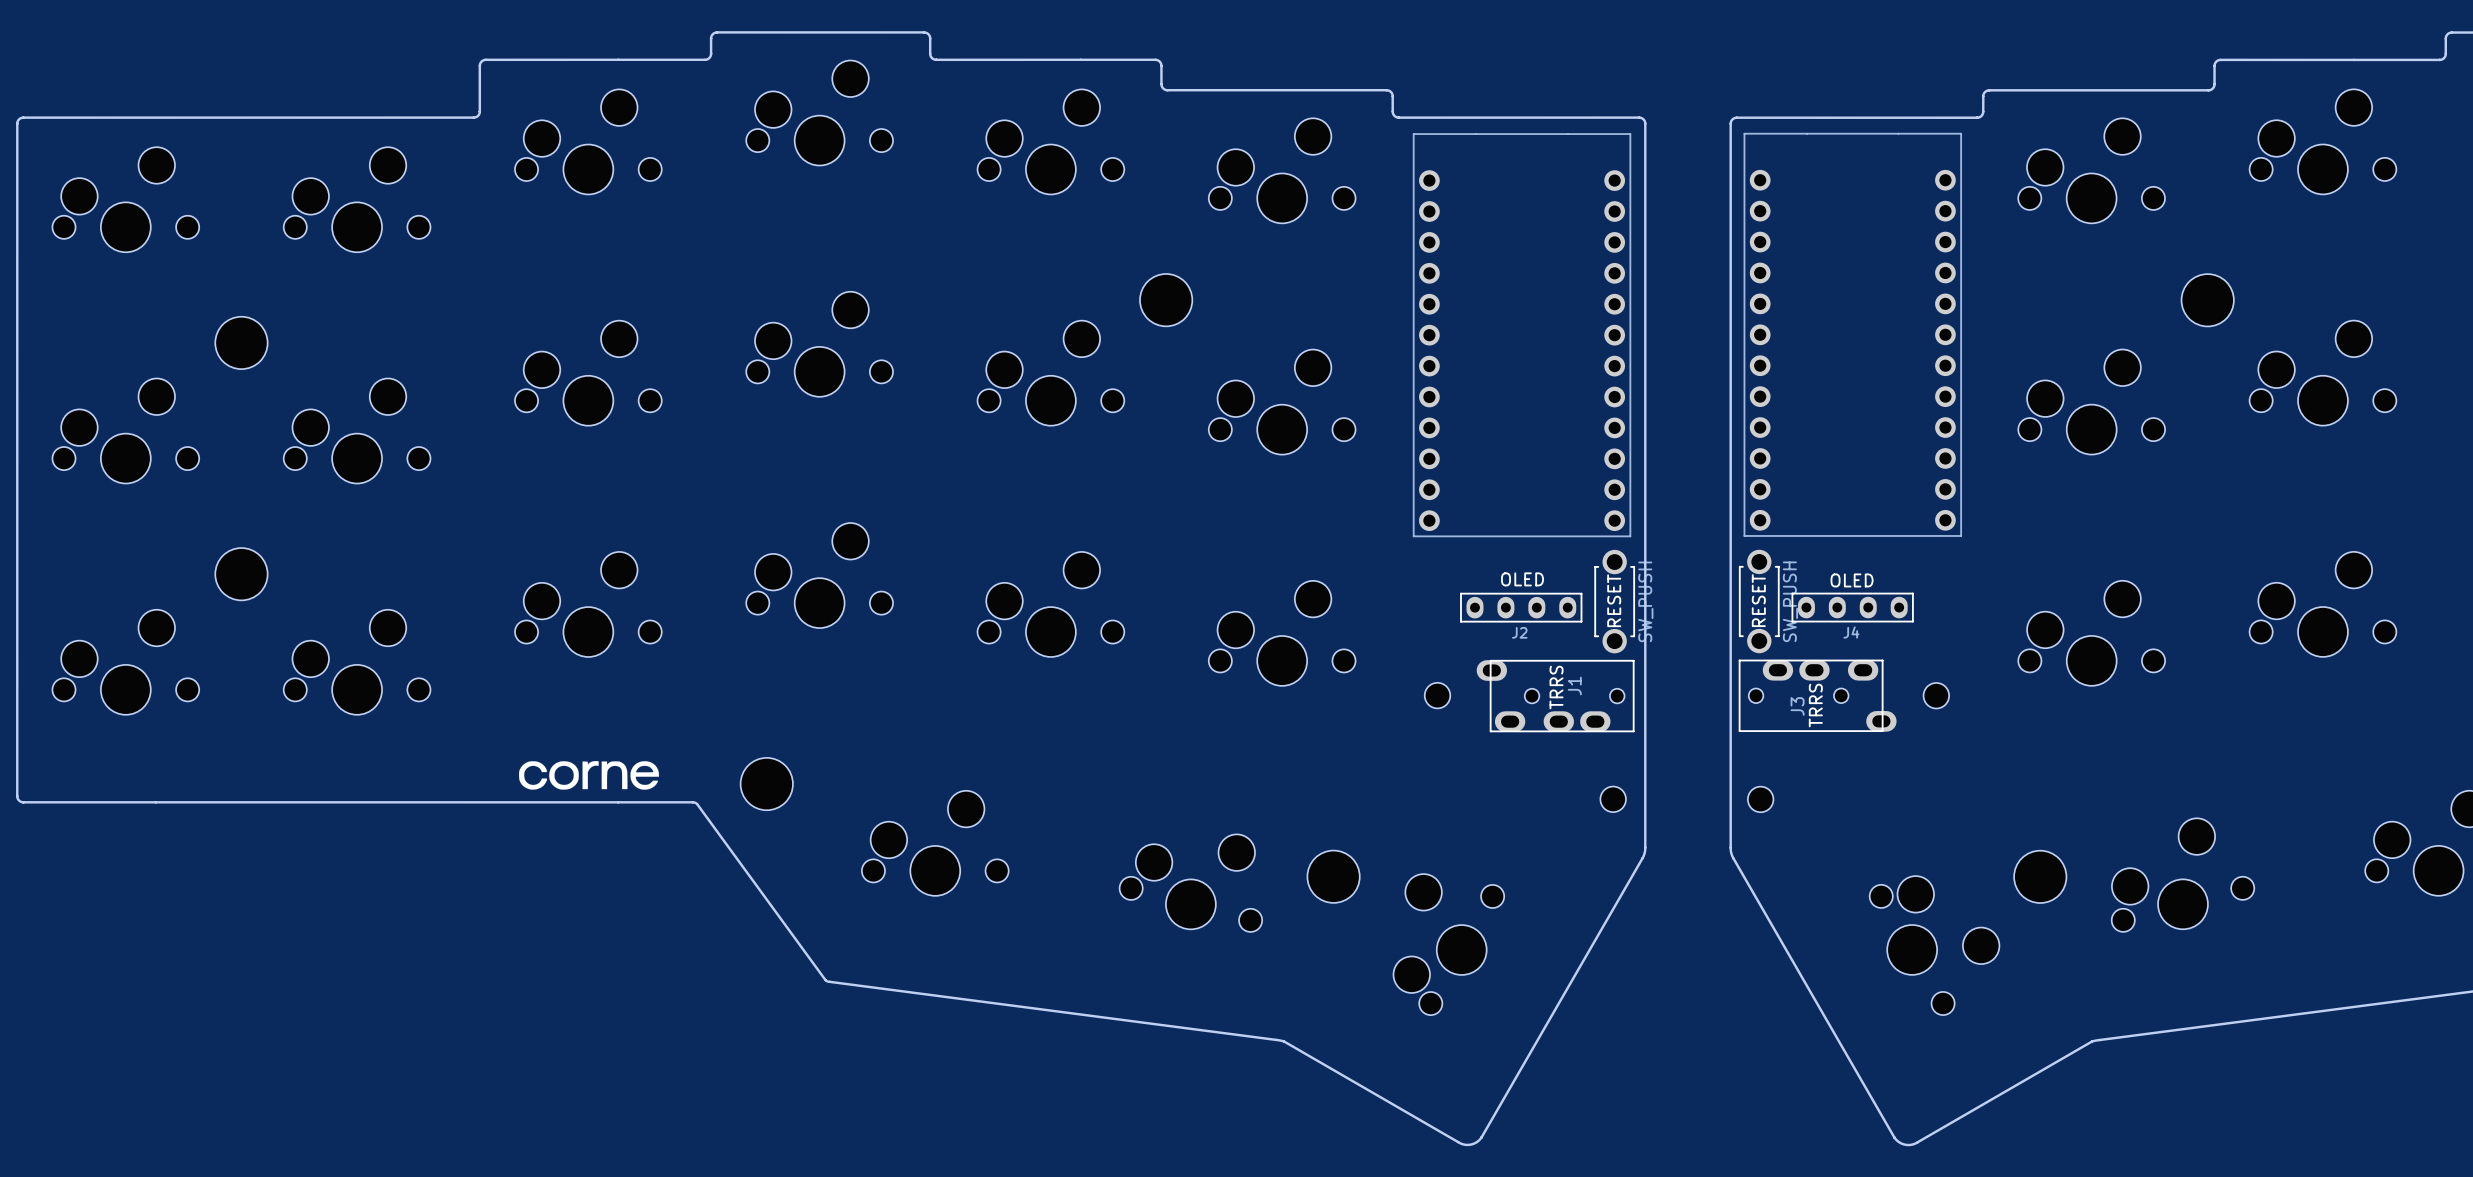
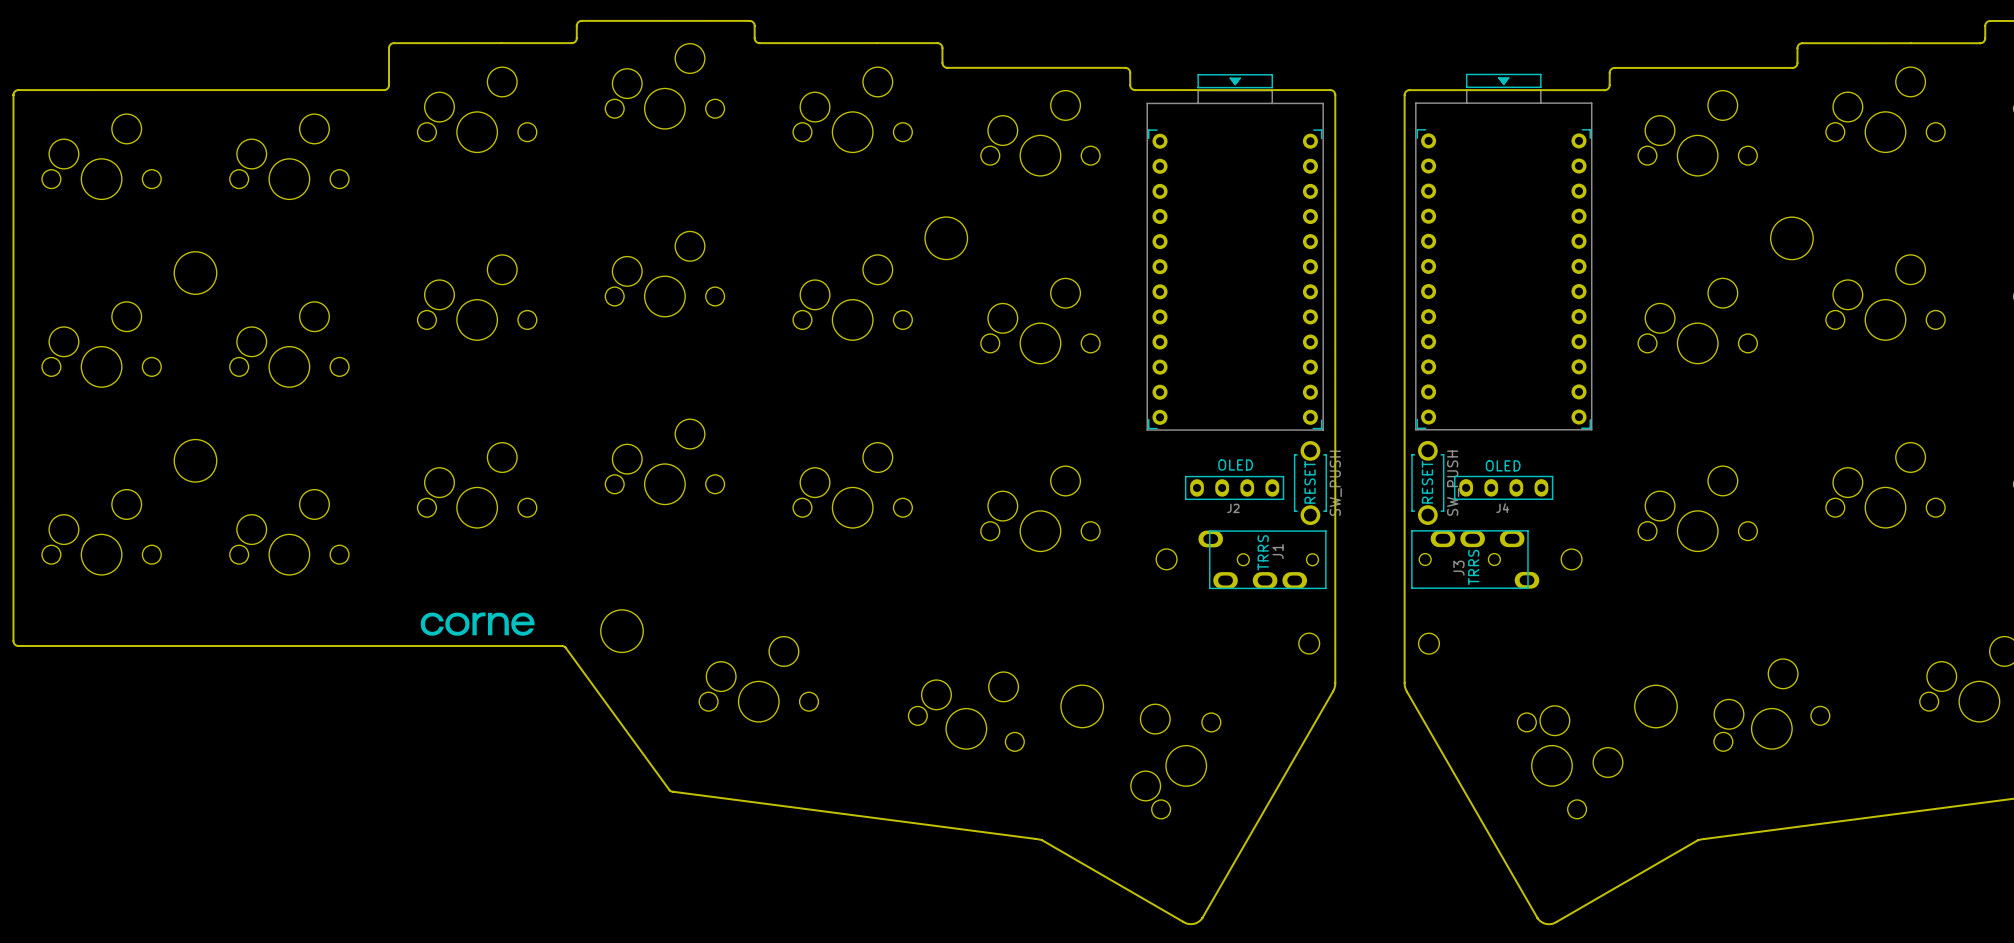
part: none -> (1235, 252)
part: none -> (1503, 252)
part: (1852, 334) -> none
part: (1522, 335) -> none

